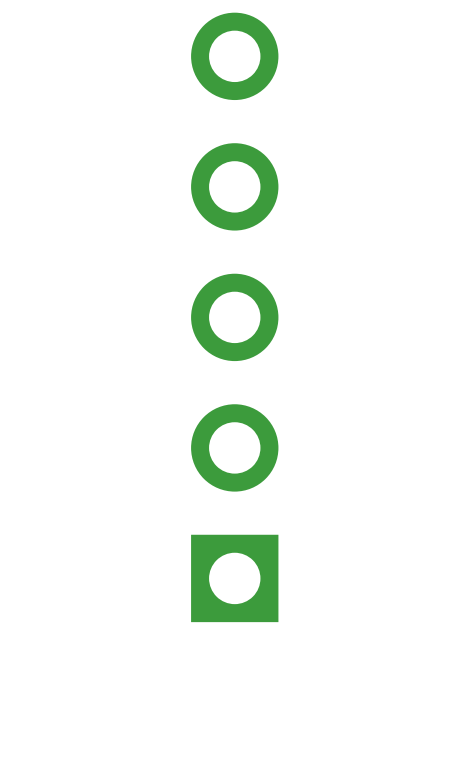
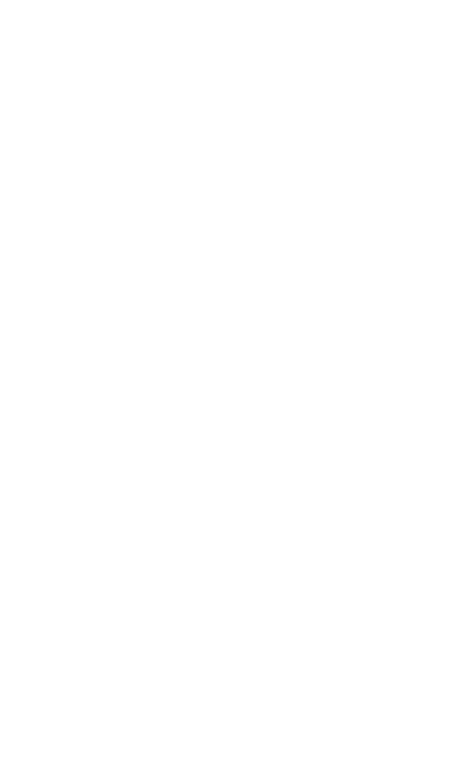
part: (234, 317) -> none

